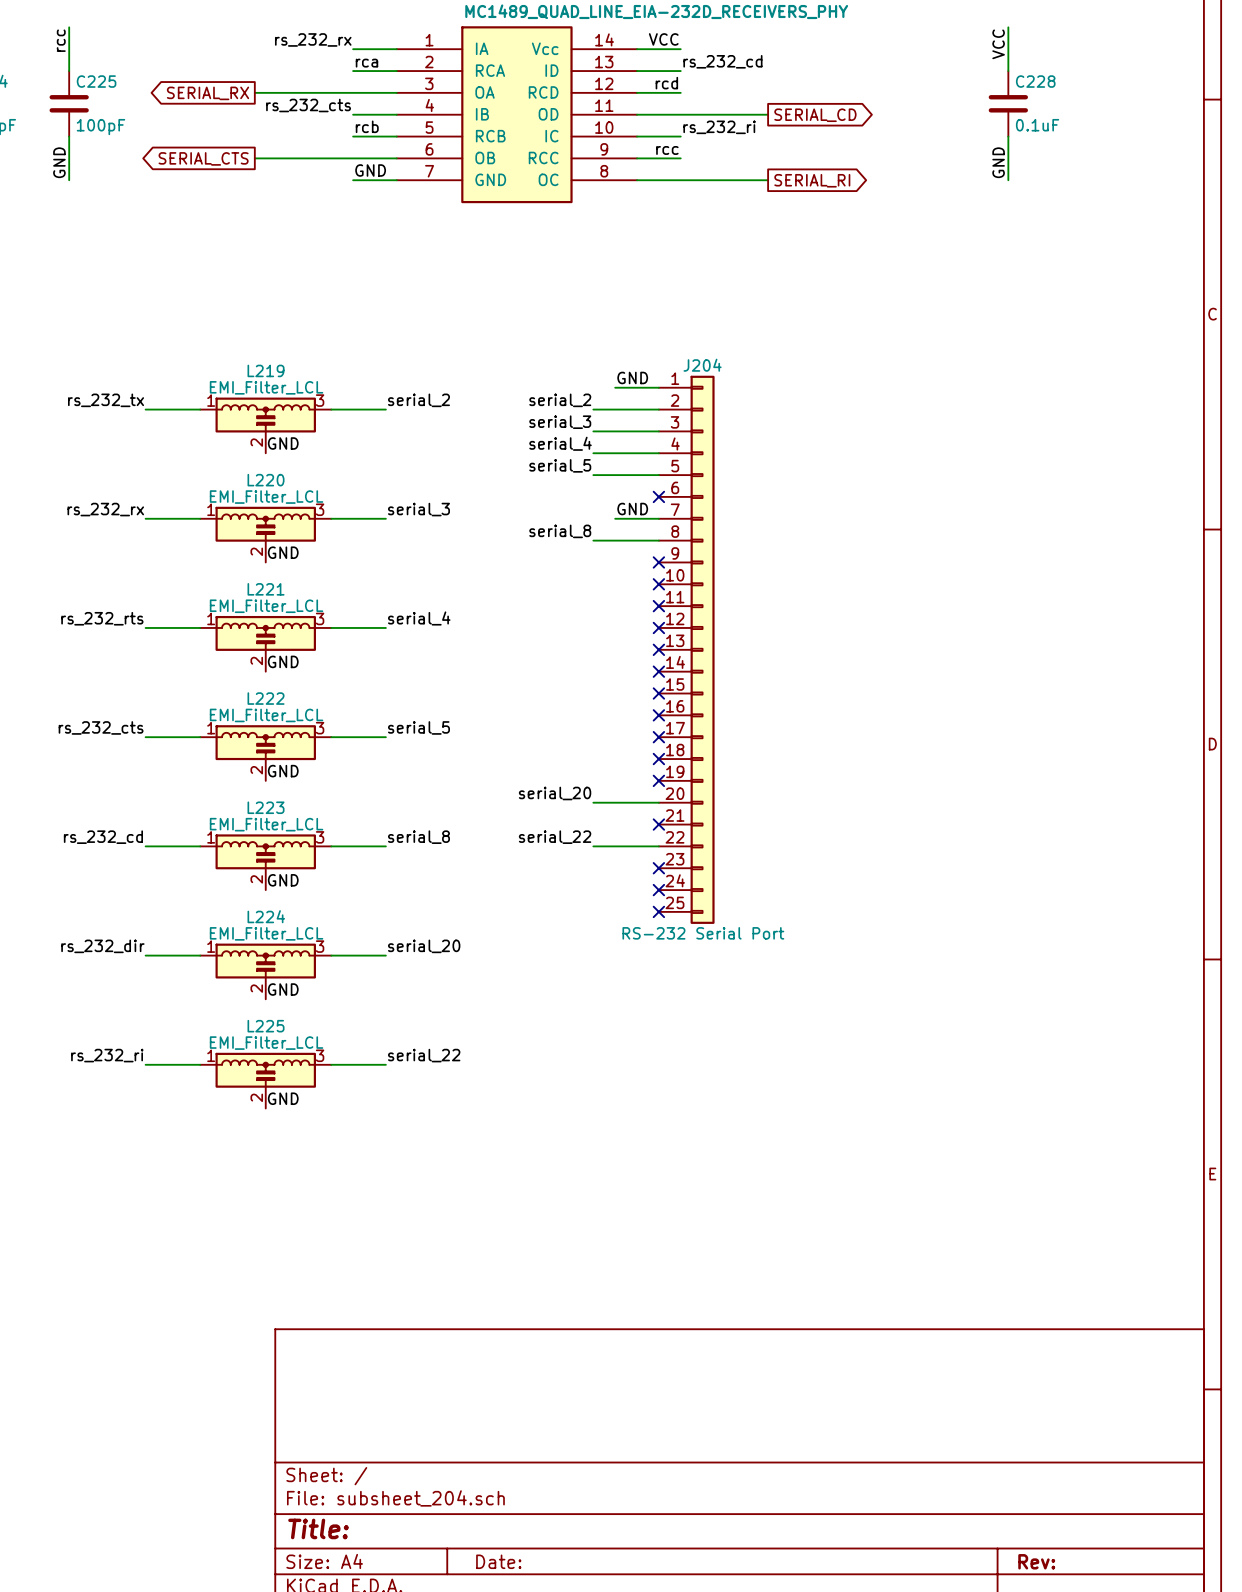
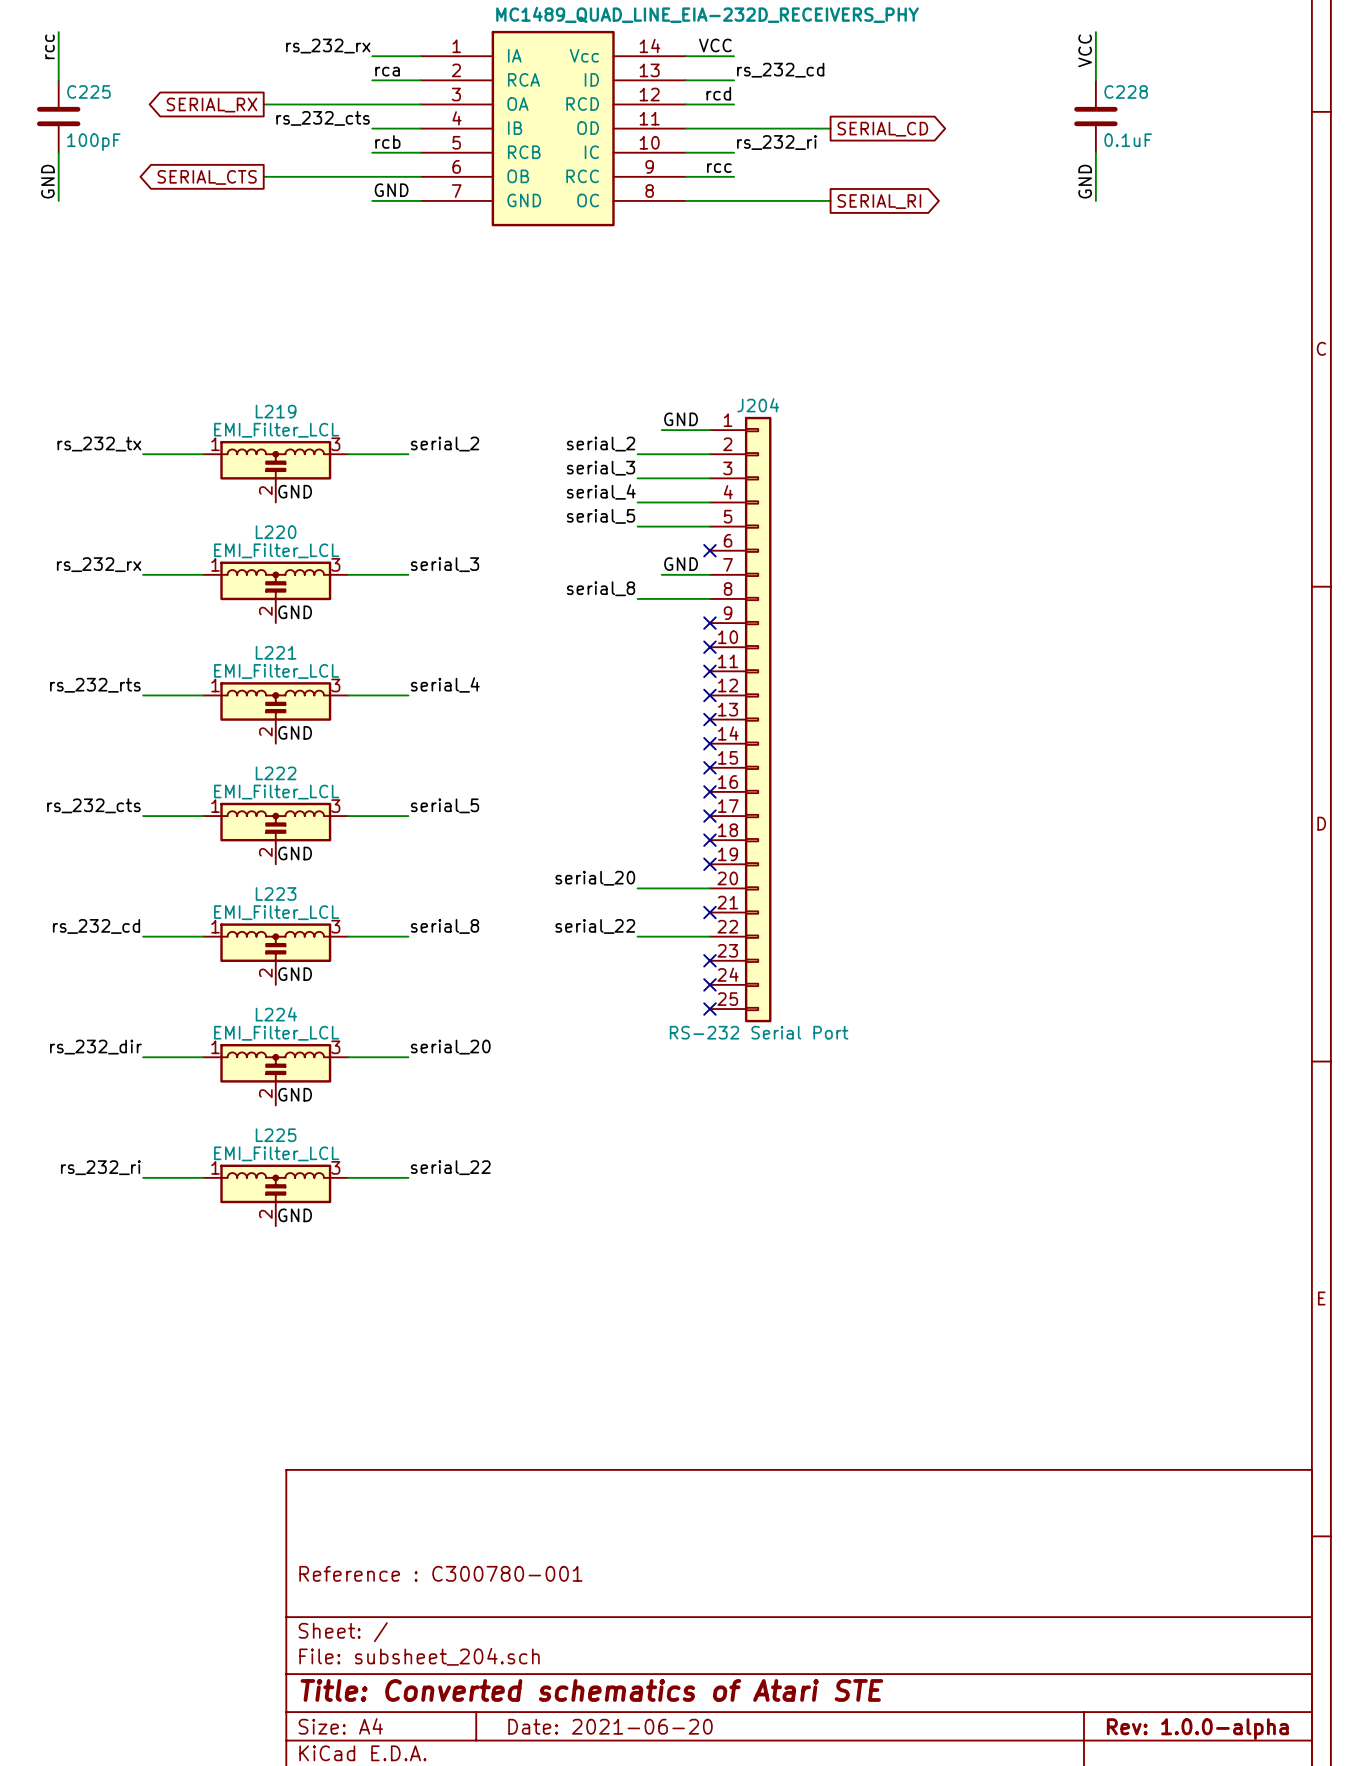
title block: none -> Reference : C300780-001 (440, 1573)
title block: Title: (318, 1528) -> Title: Converted schematics of Atari STE (591, 1690)
title block: Date: (498, 1561) -> Date: 2021-06-20 (610, 1726)
title block: Rev: (1036, 1561) -> Rev: 1.0.0-alpha (1197, 1729)

